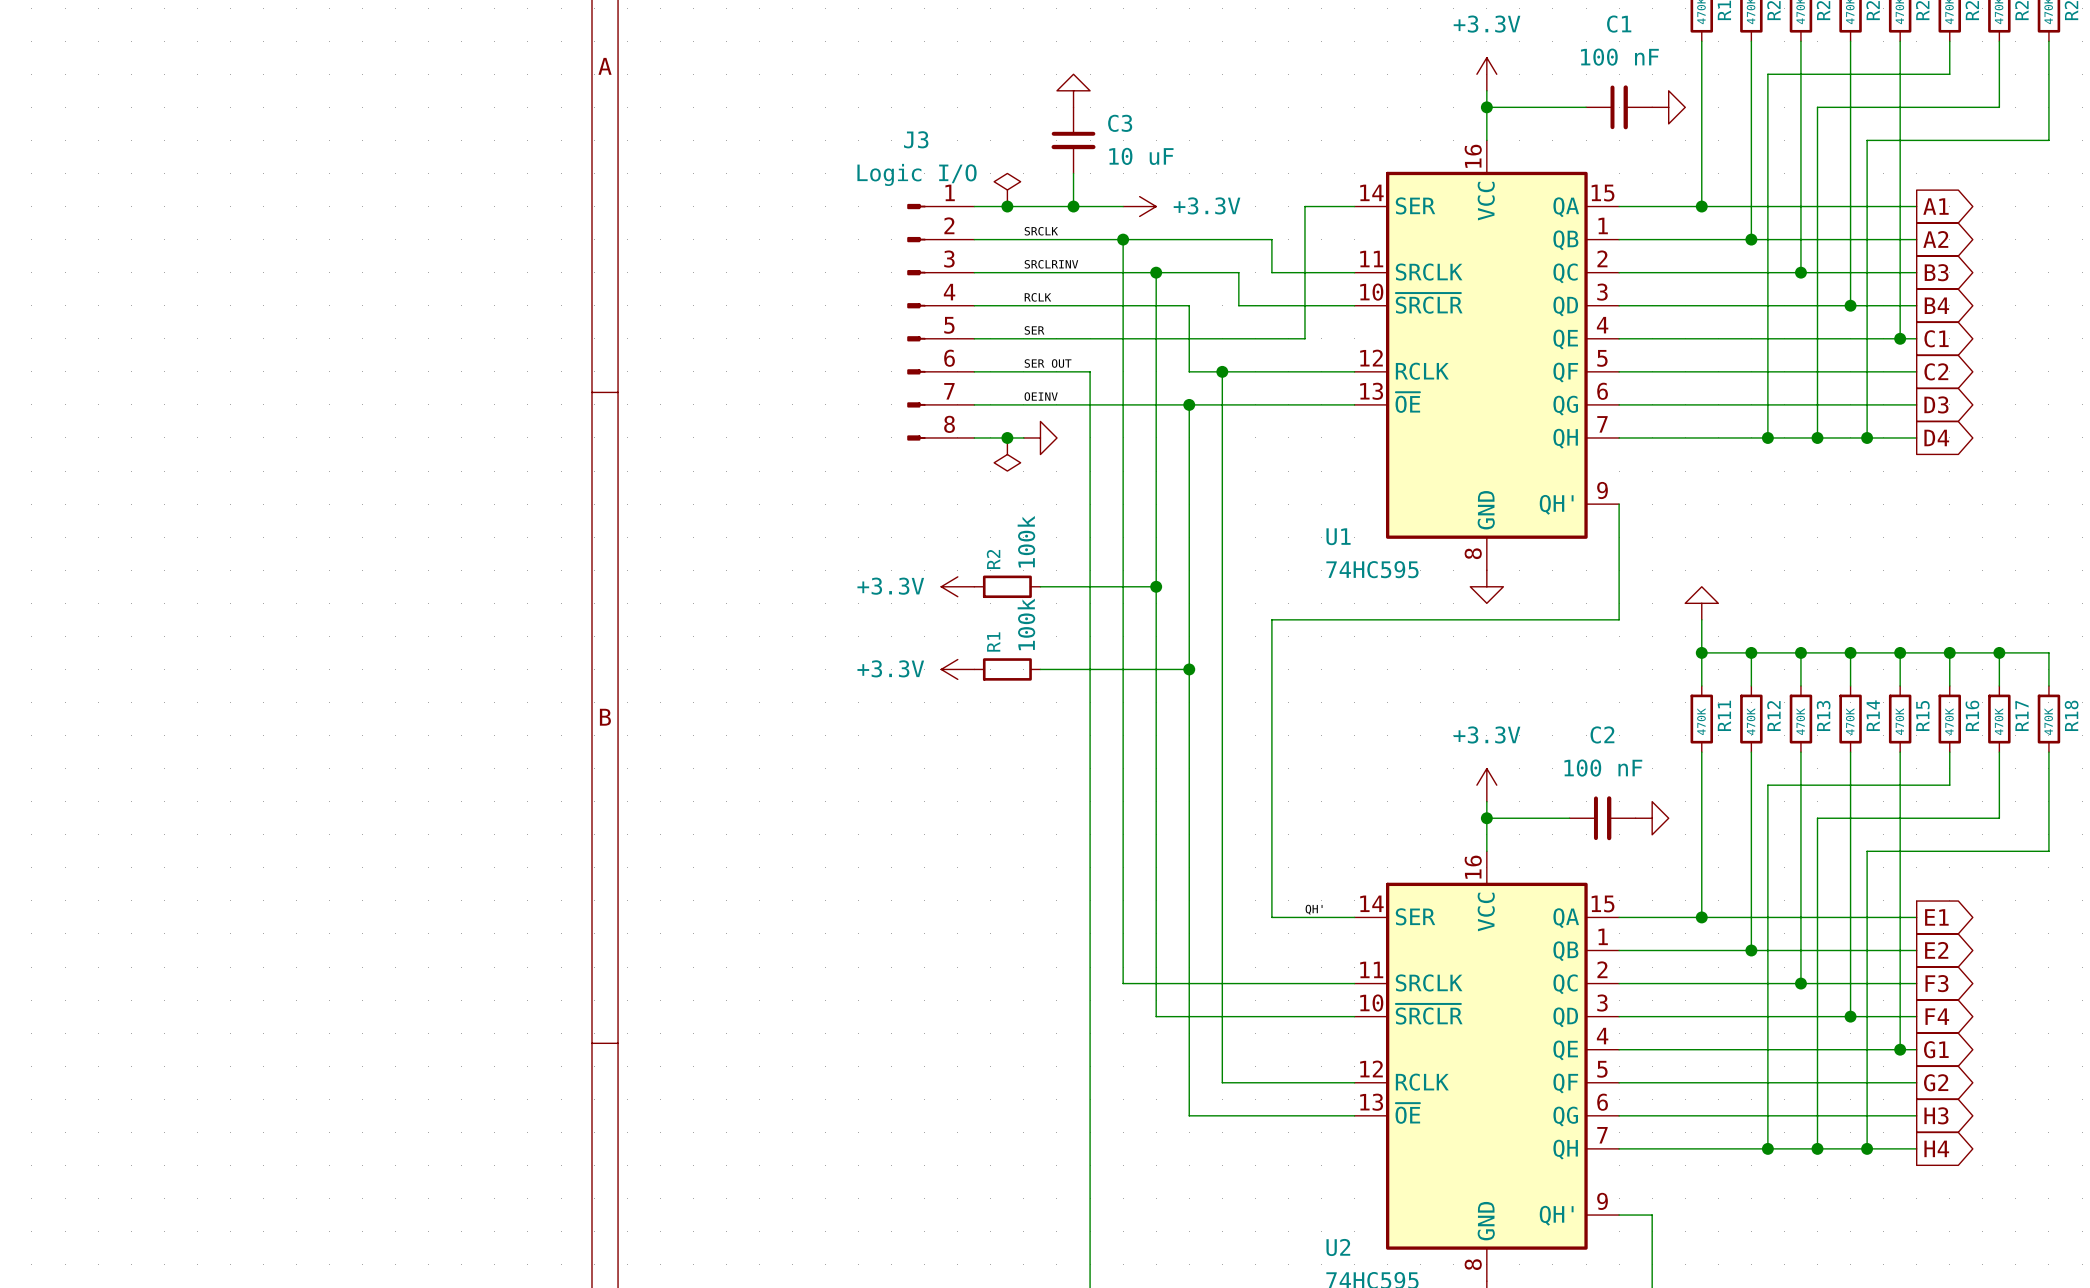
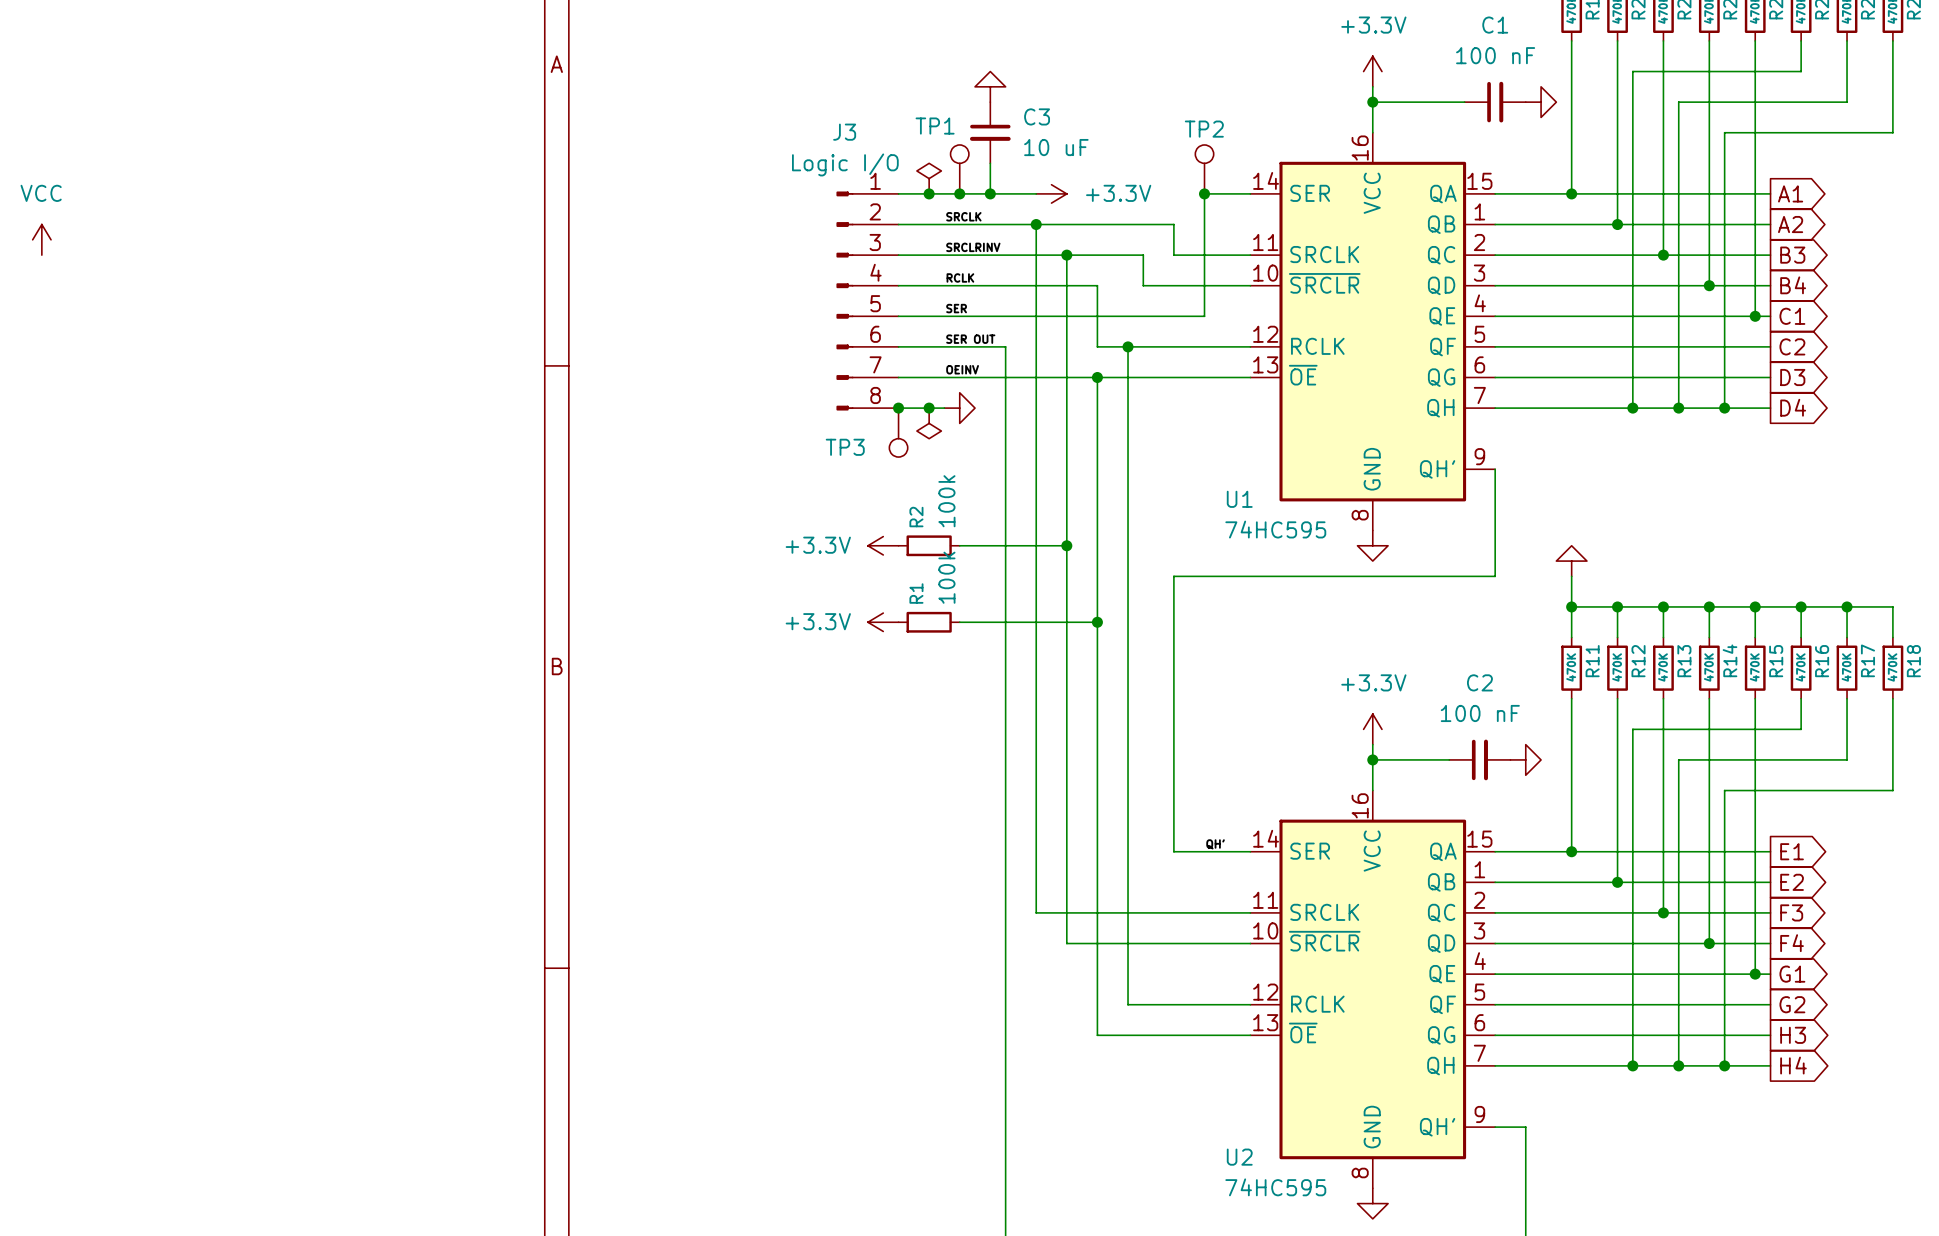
TP1: none -> (959, 169)
TP2: none -> (1204, 169)
junction: none -> (959, 193)
junction: none -> (1204, 193)
power symbol: none -> VCC (41, 239)
junction: none -> (898, 408)
TP3: none -> (898, 432)

